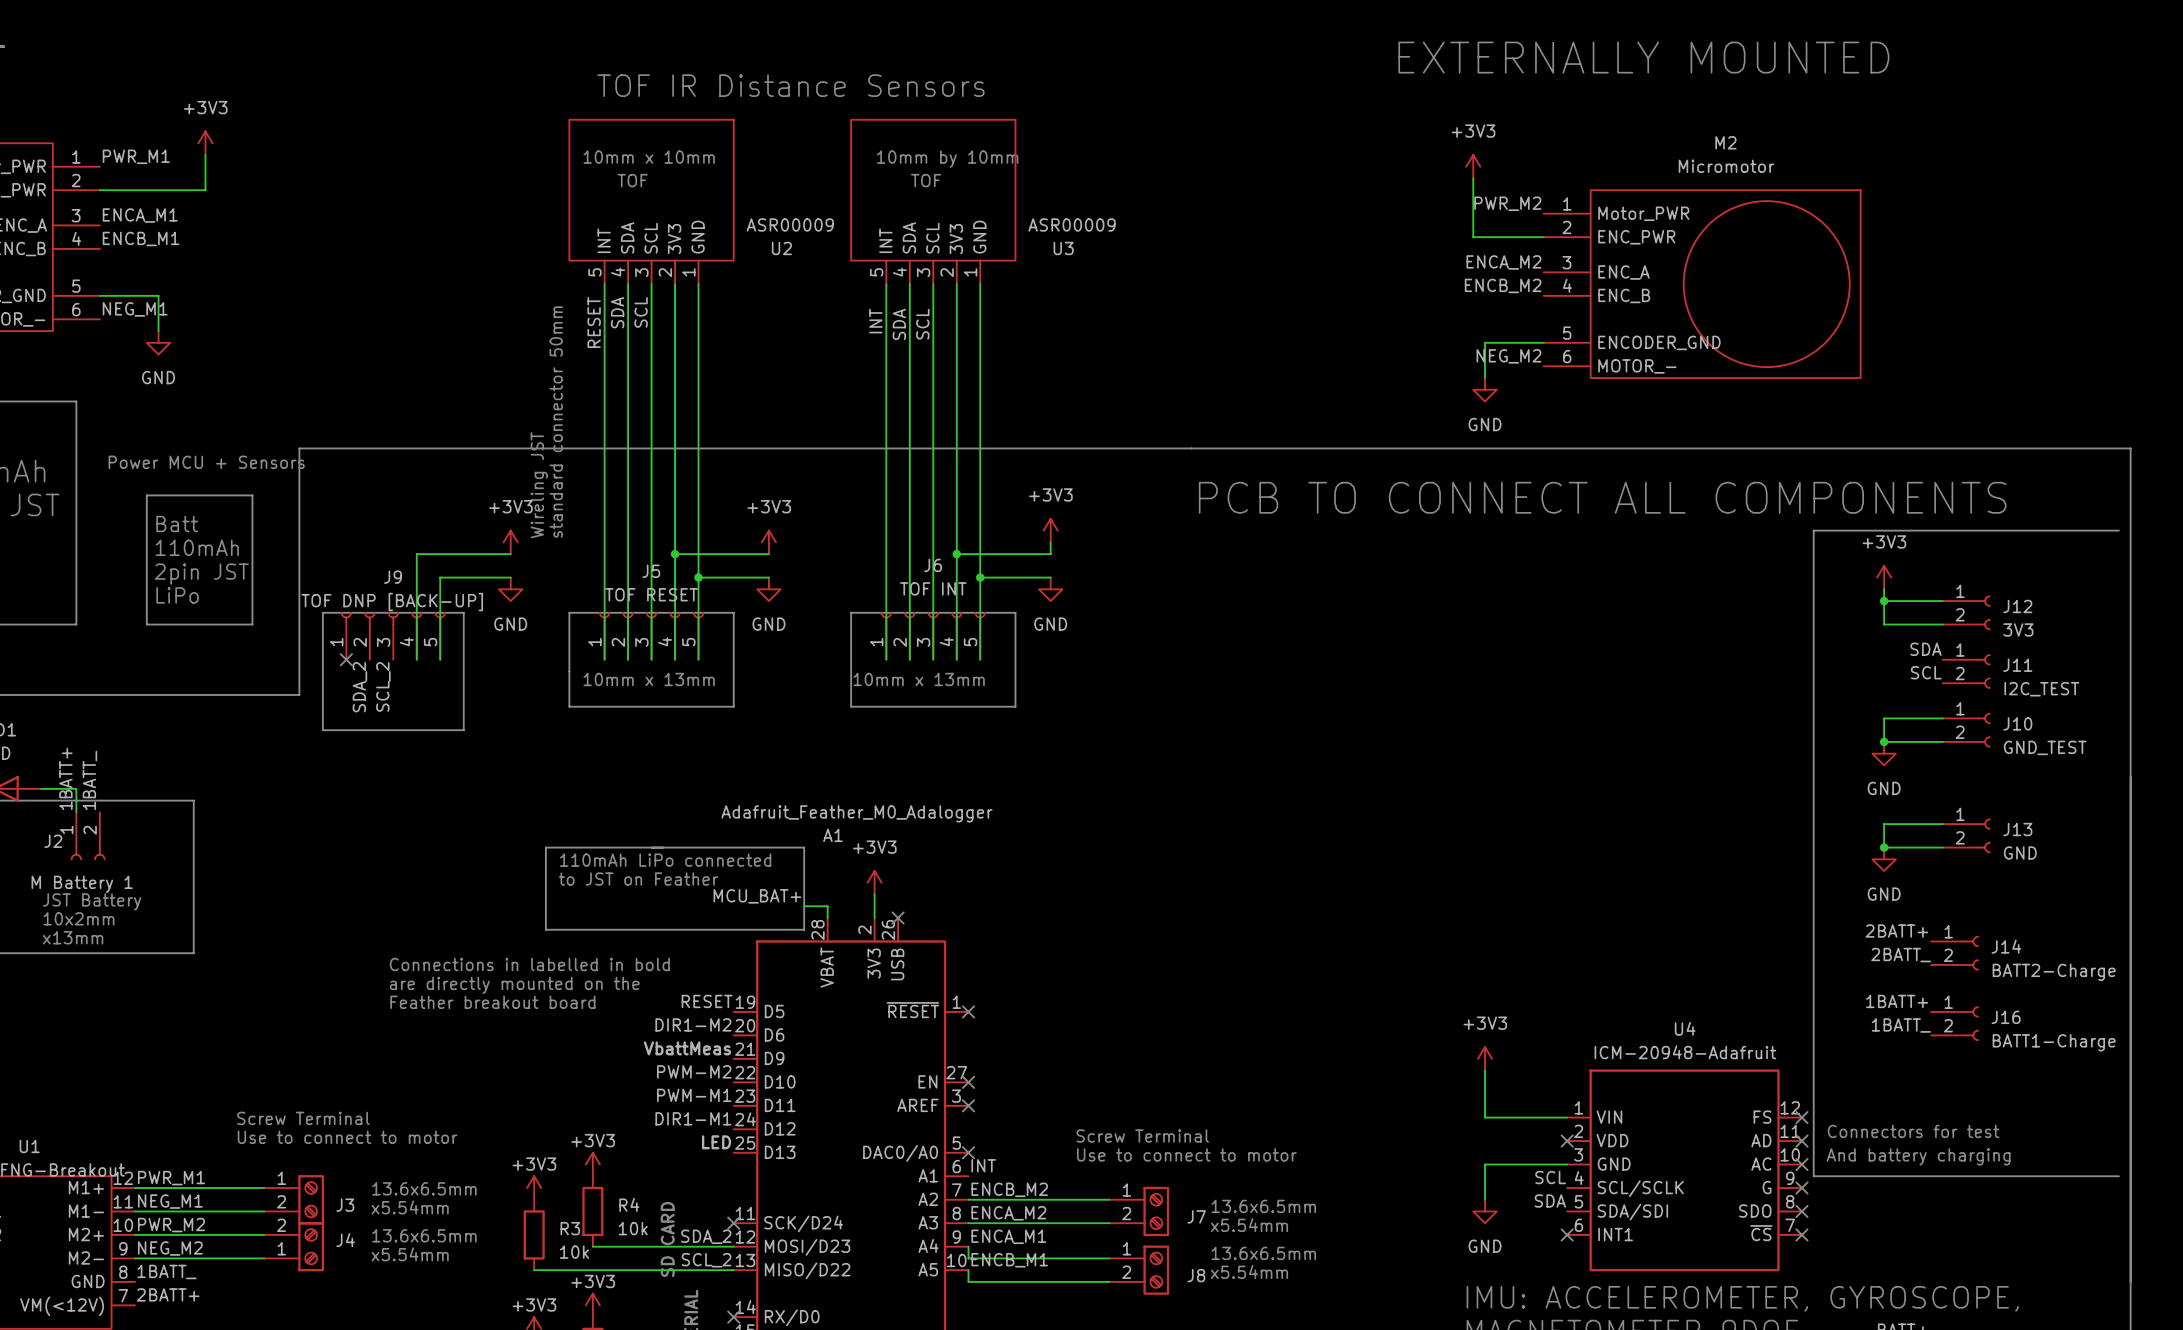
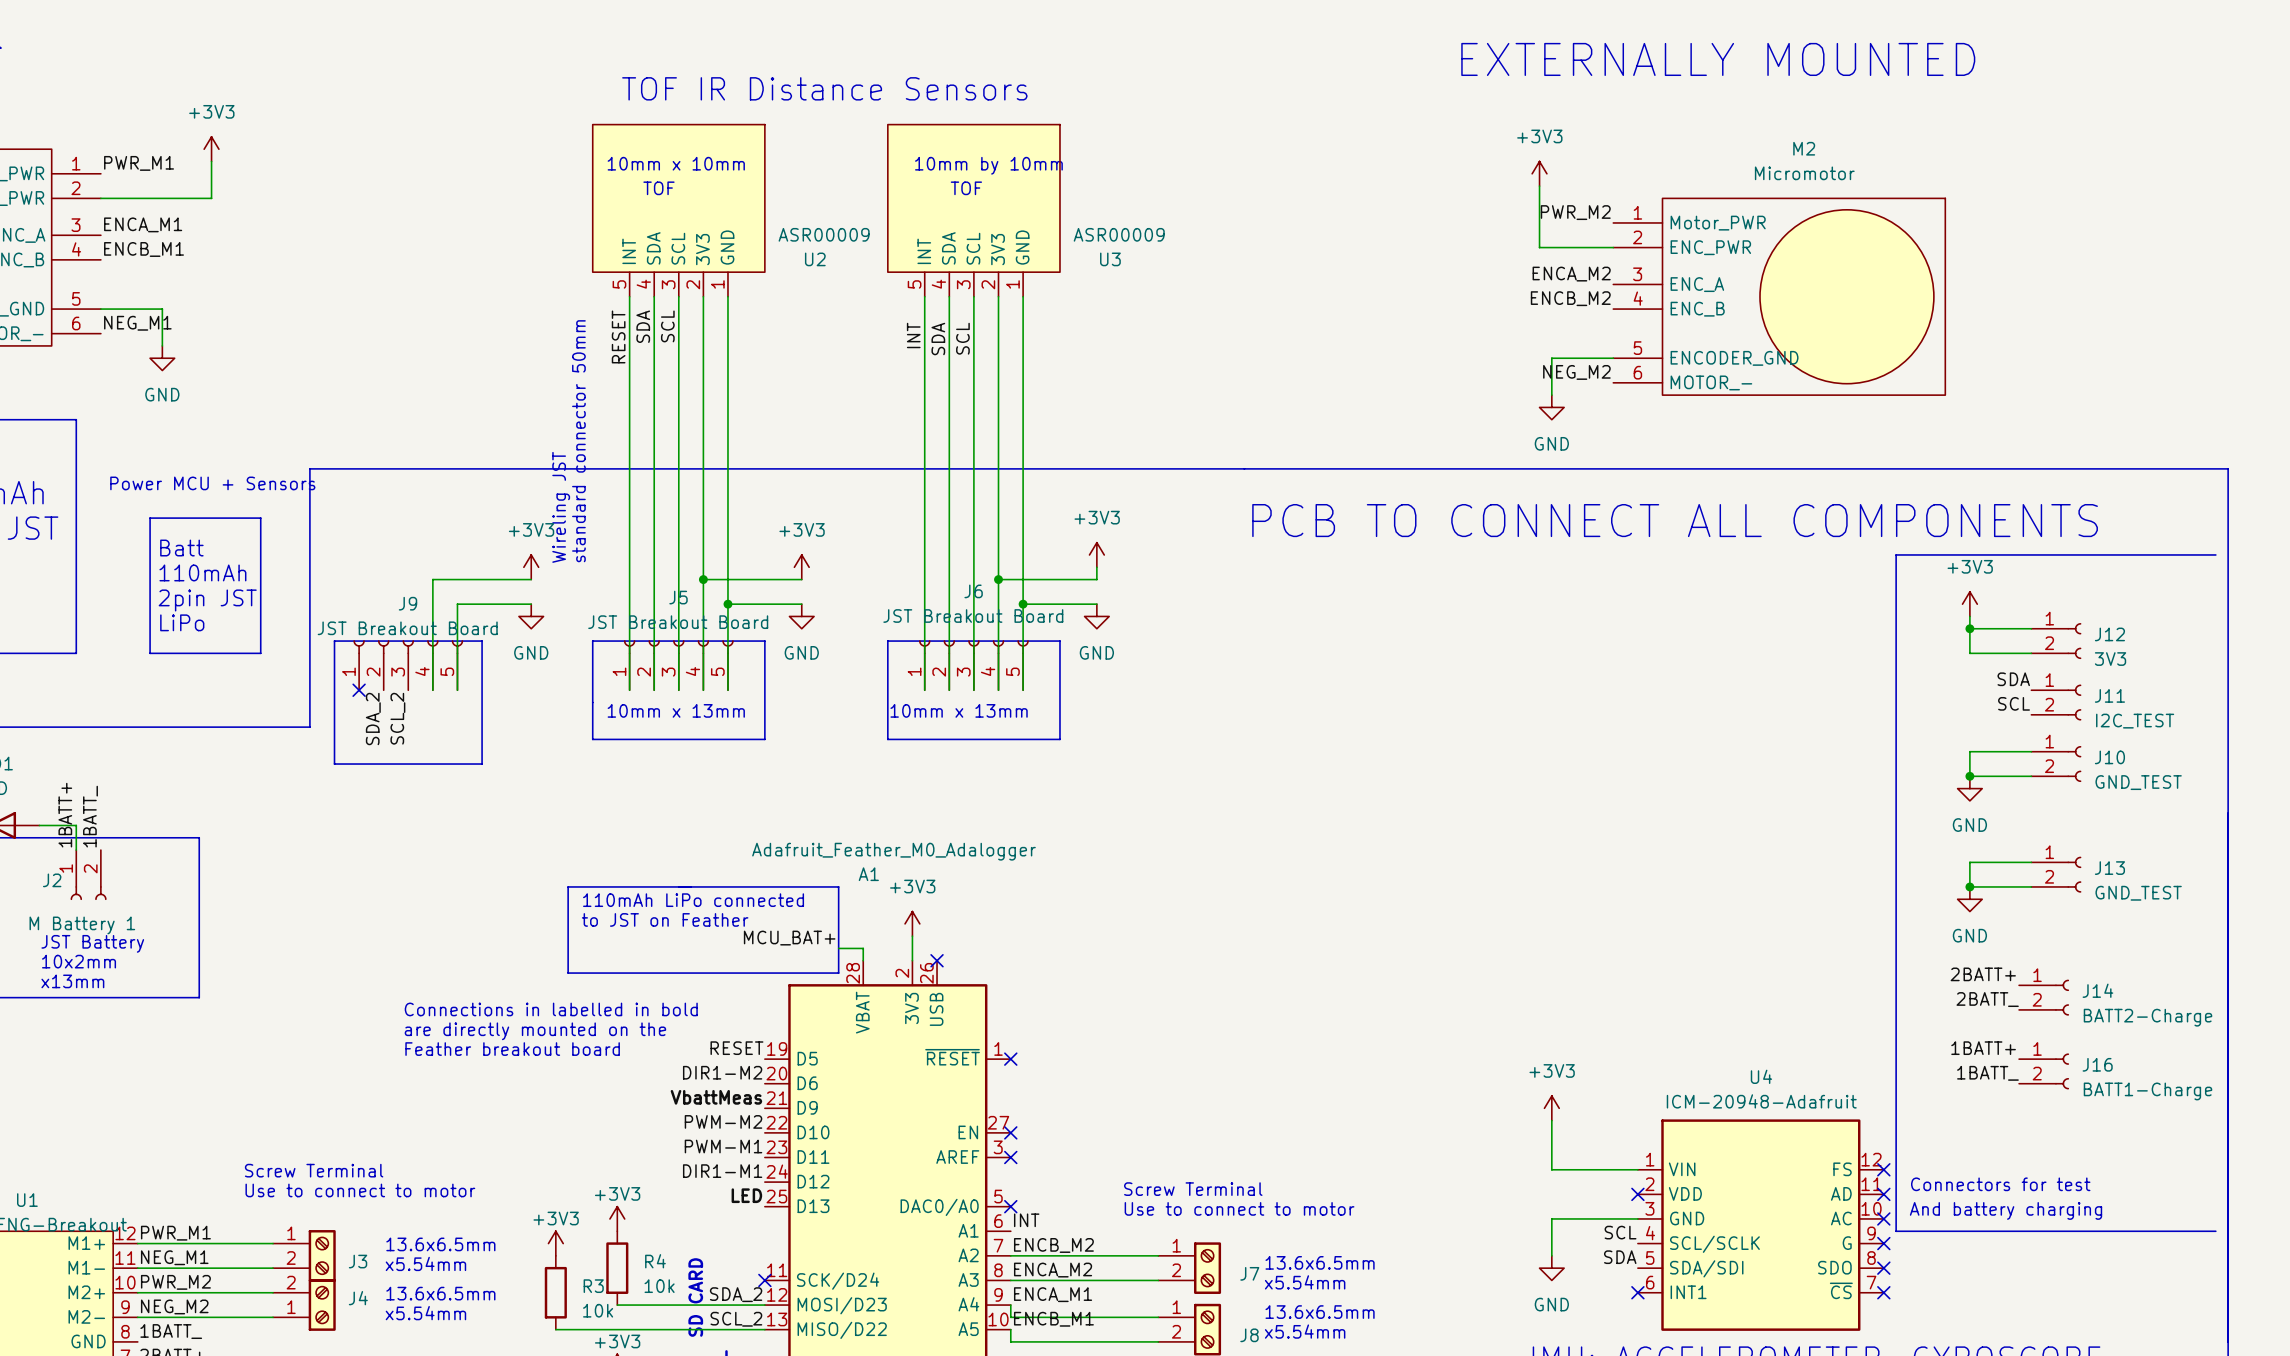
J6 value: TOF INT (933, 588) -> JST Breakout Board (973, 616)
J5 value: TOF RESET (651, 594) -> JST Breakout Board (678, 622)
J9 value: TOF DNP [BACK-UP] (392, 602) -> JST Breakout Board (407, 628)
J13 value: GND (2020, 853) -> GND_TEST (2138, 893)

